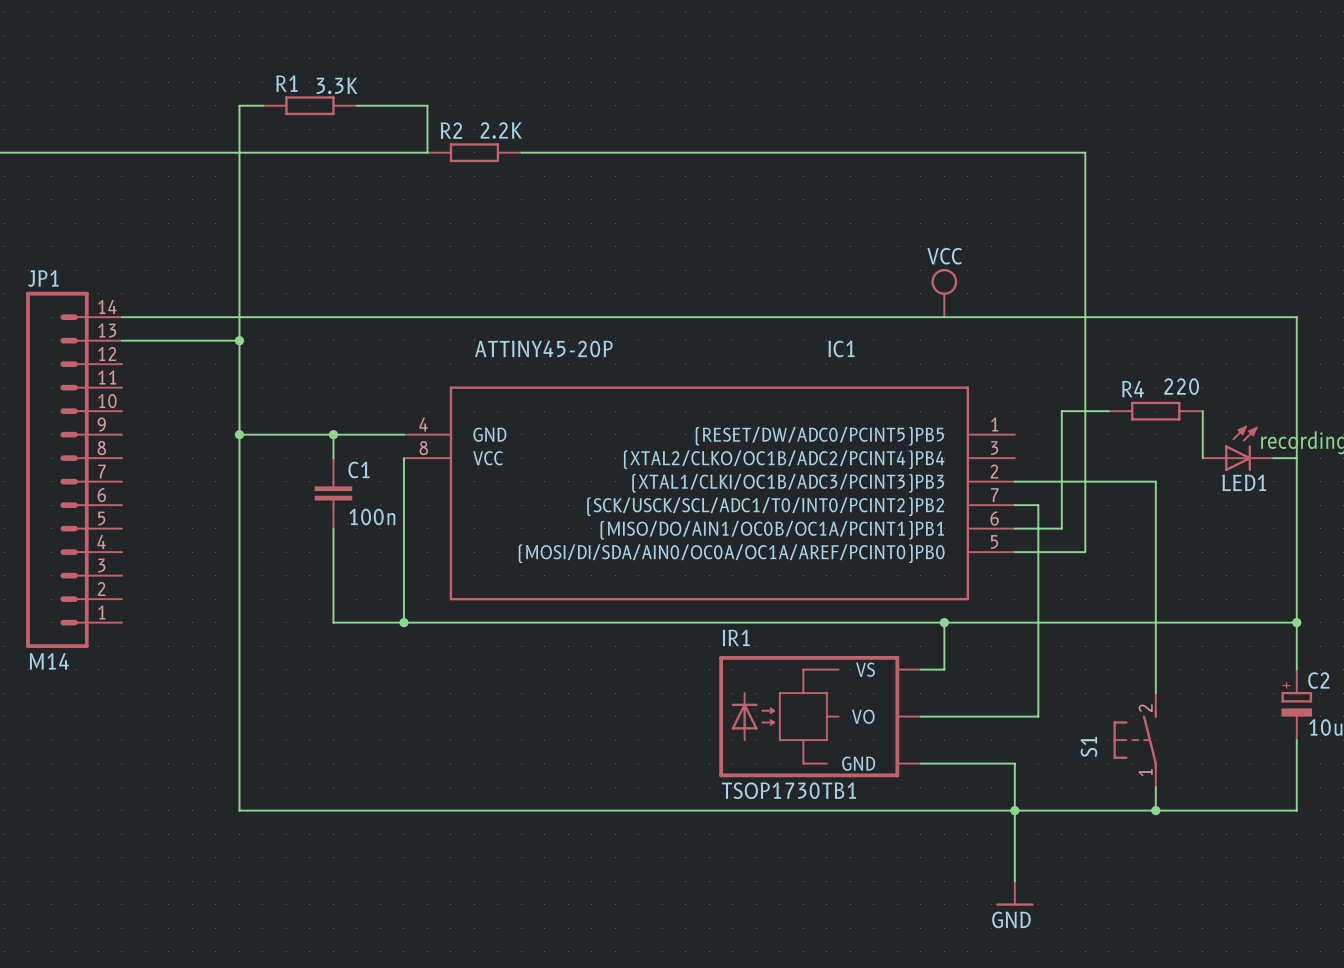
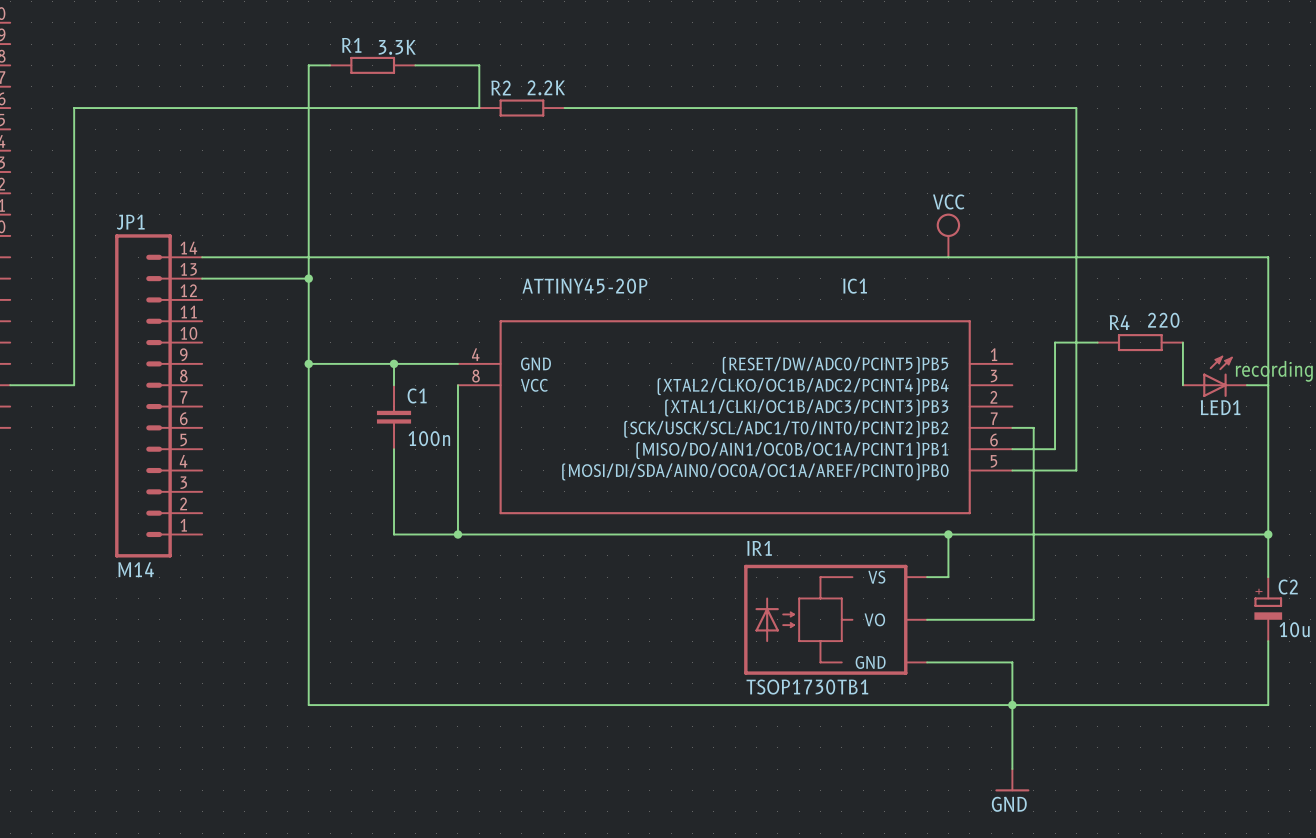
wire: (1014, 481) (1155, 481) (1155, 693) -> none
S1: (1135, 740) -> none
wire: (1155, 787) (1155, 810) -> none
junction: (1155, 810) -> none

